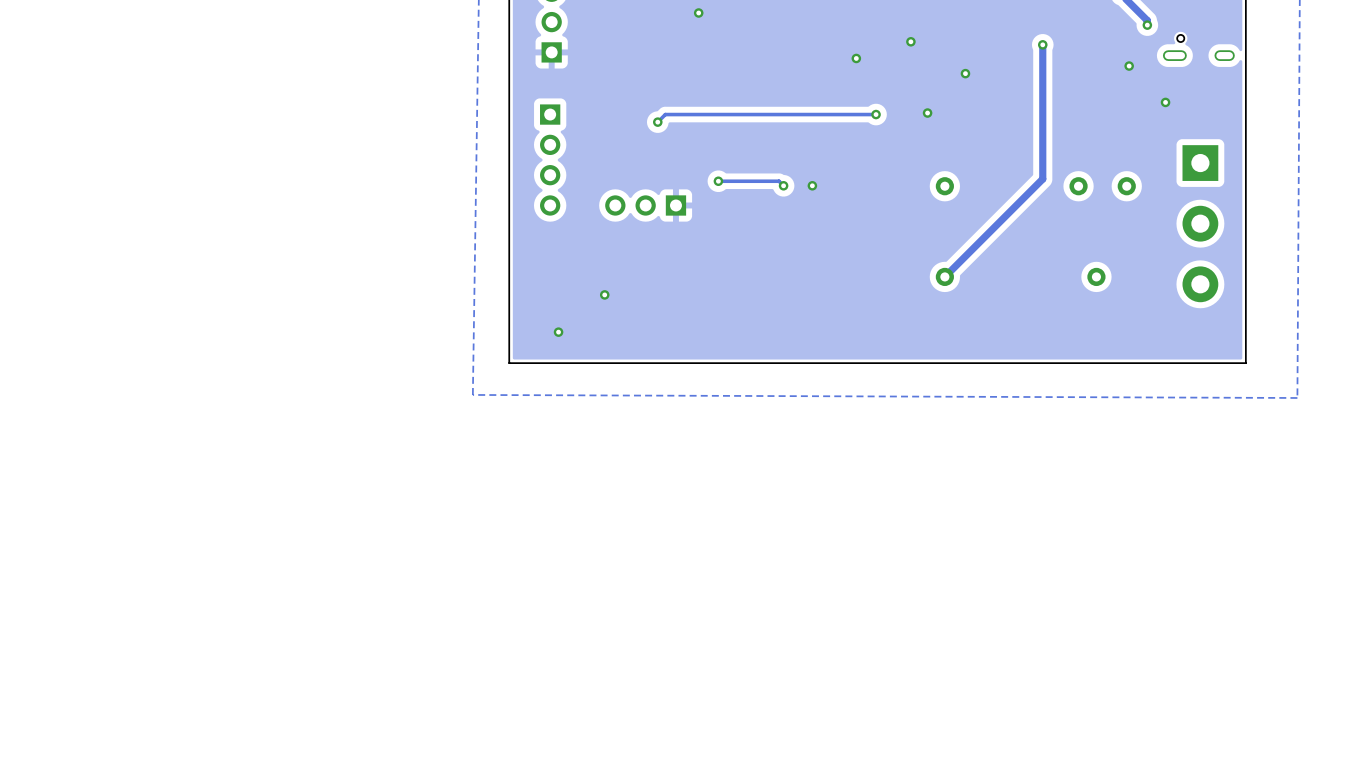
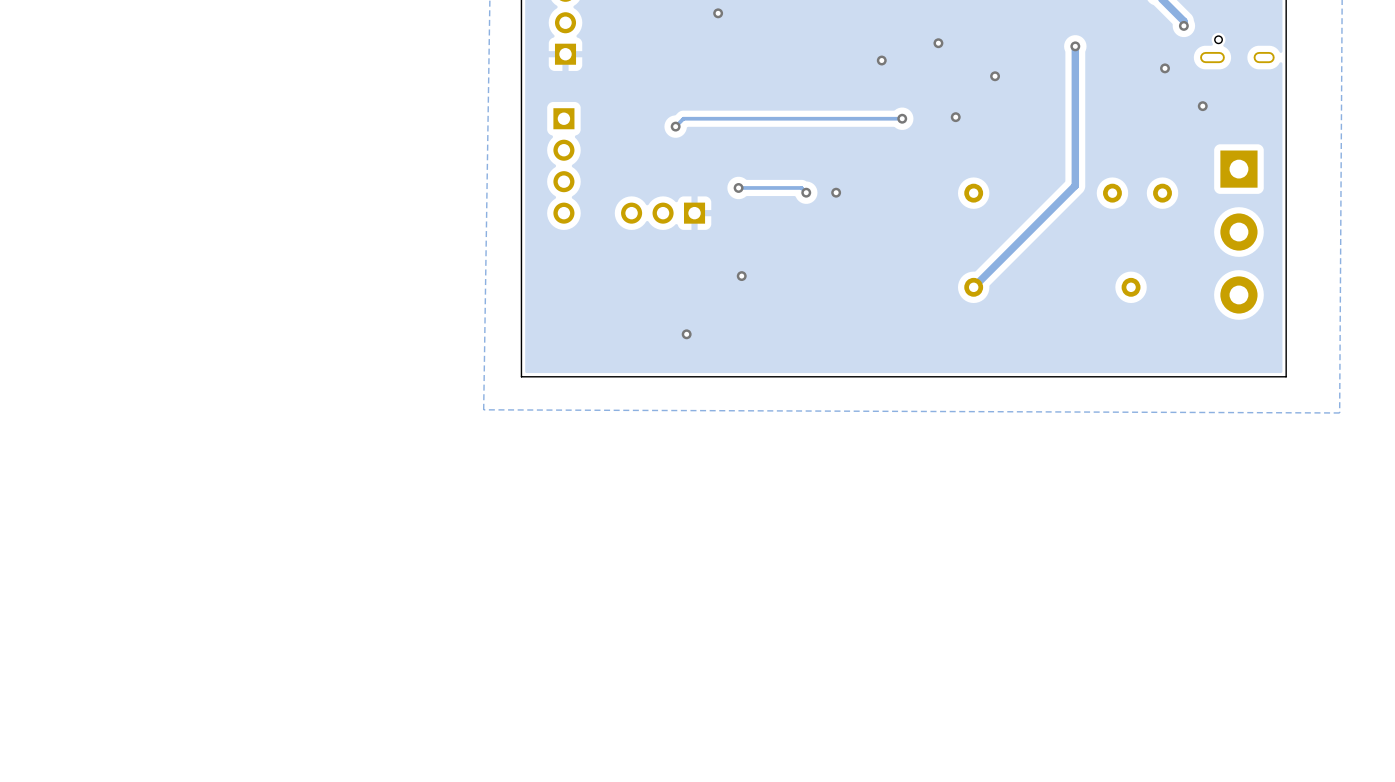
via: none -> (741, 276)
via: (604, 294) -> none
via: none -> (686, 334)
via: (558, 332) -> none

